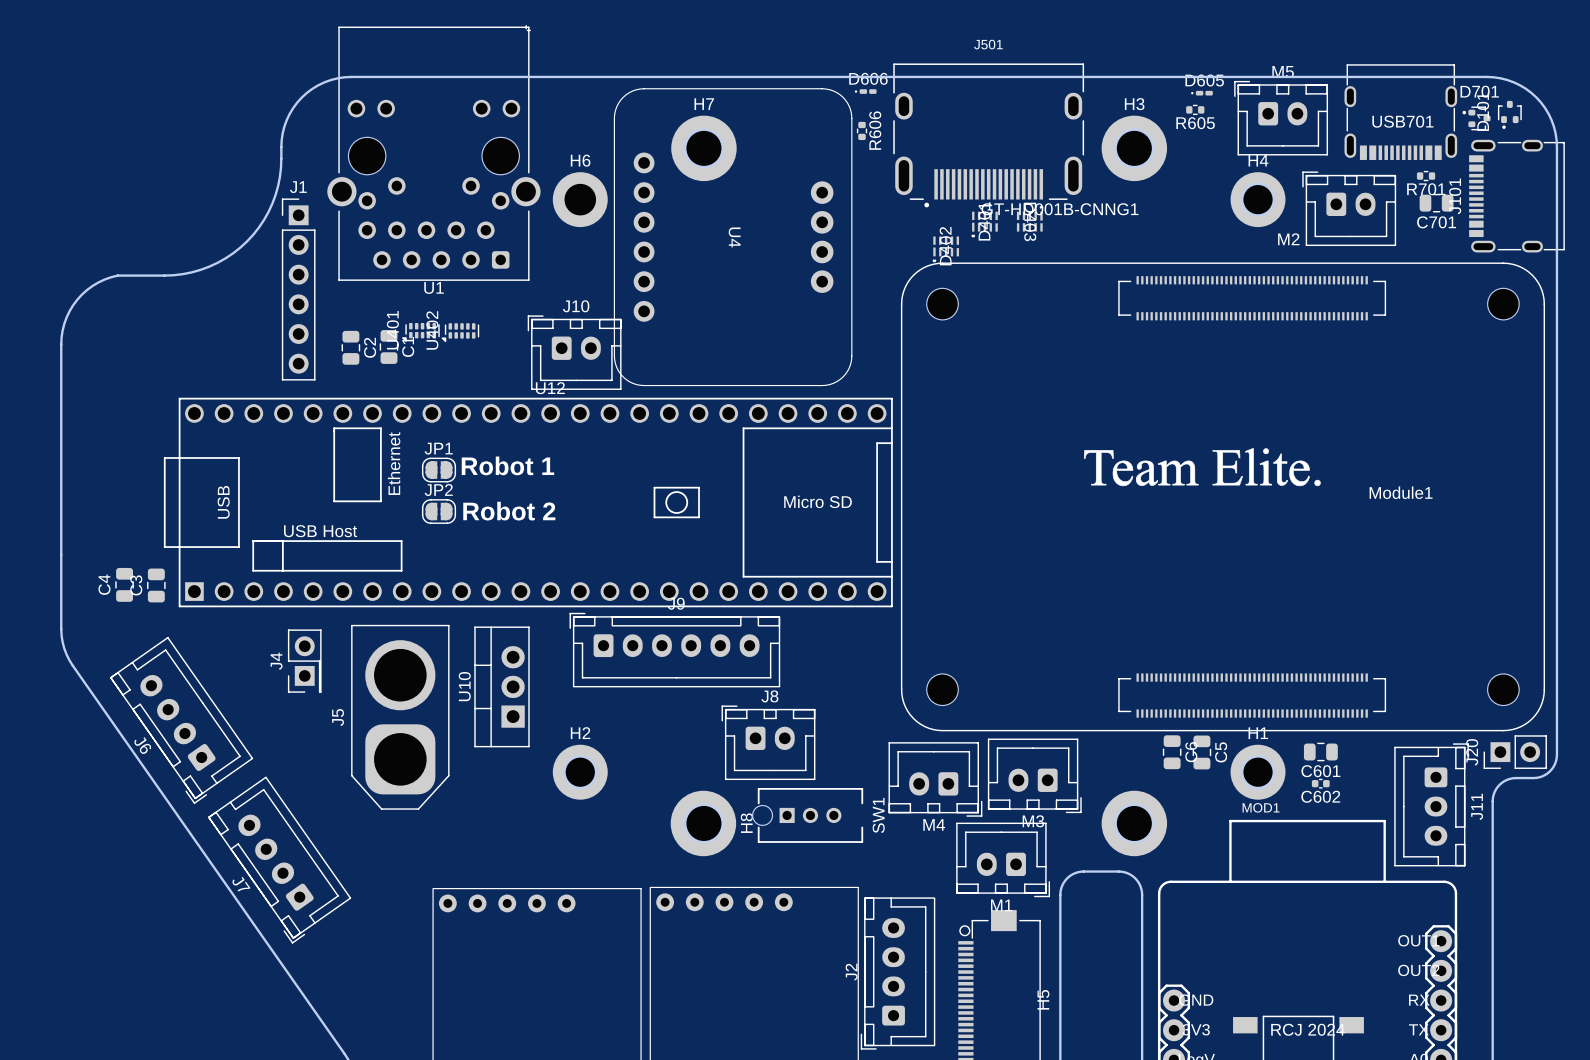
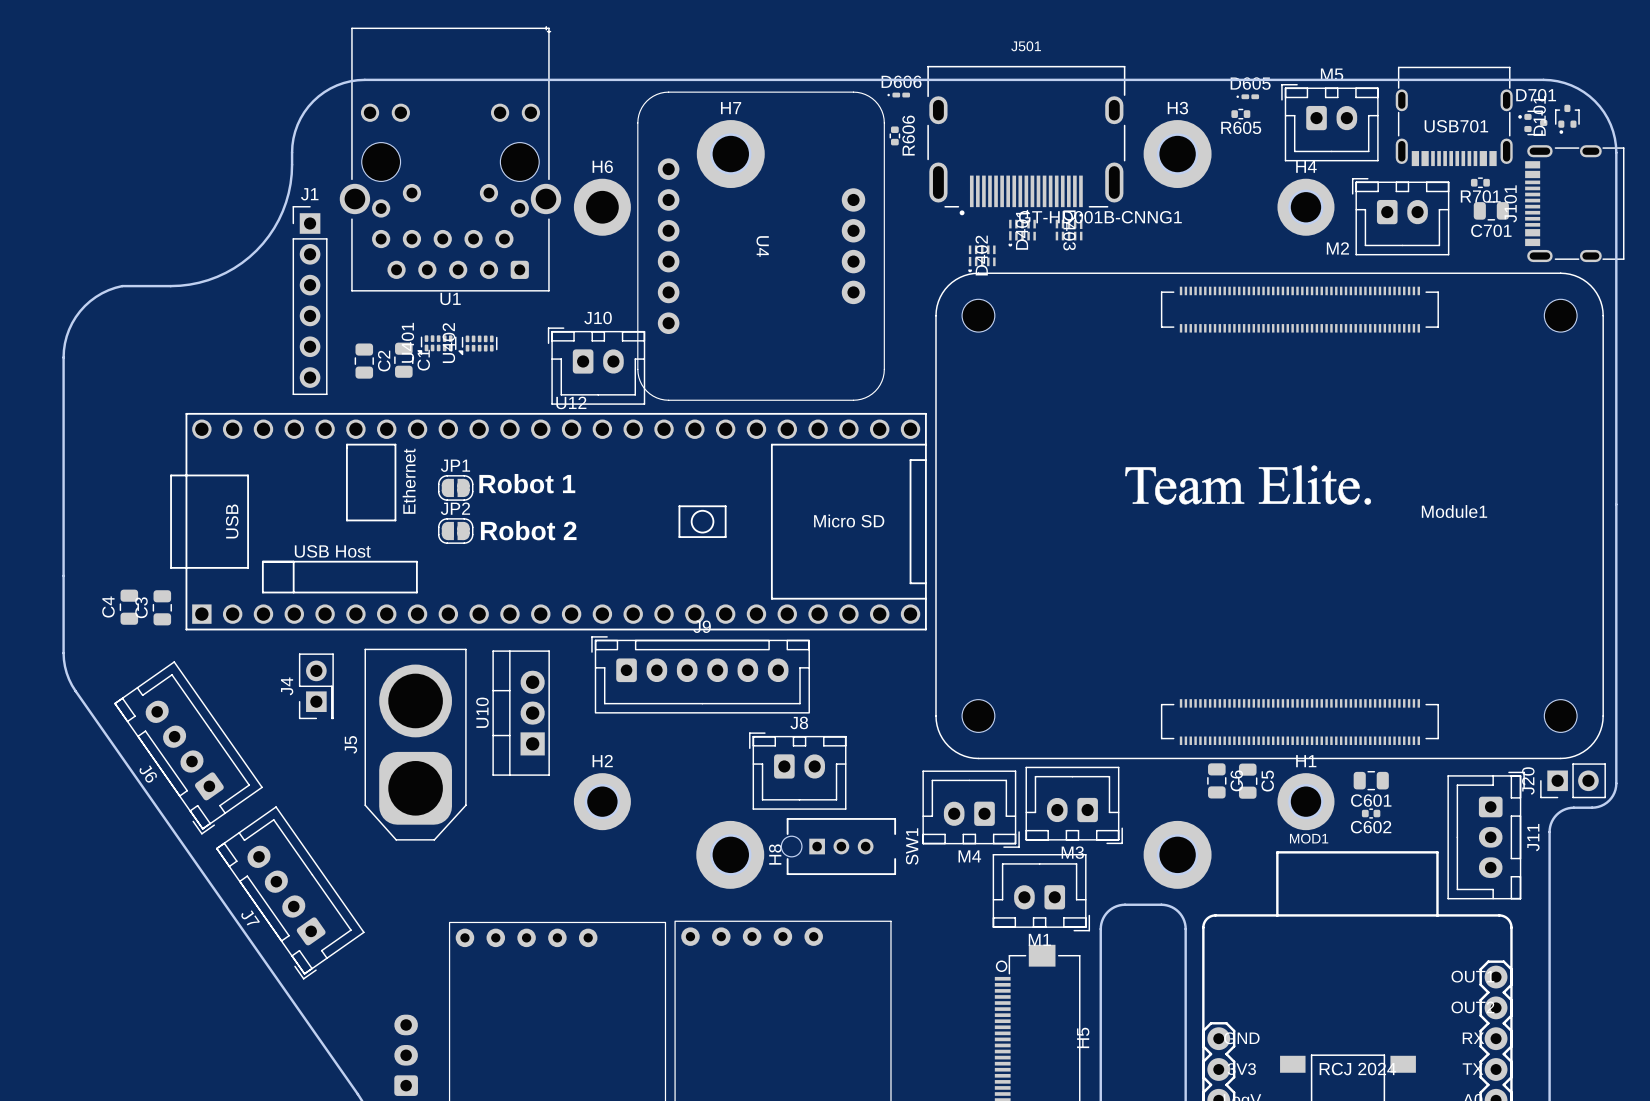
J2: (898, 973) -> none
part: none -> (406, 1055)

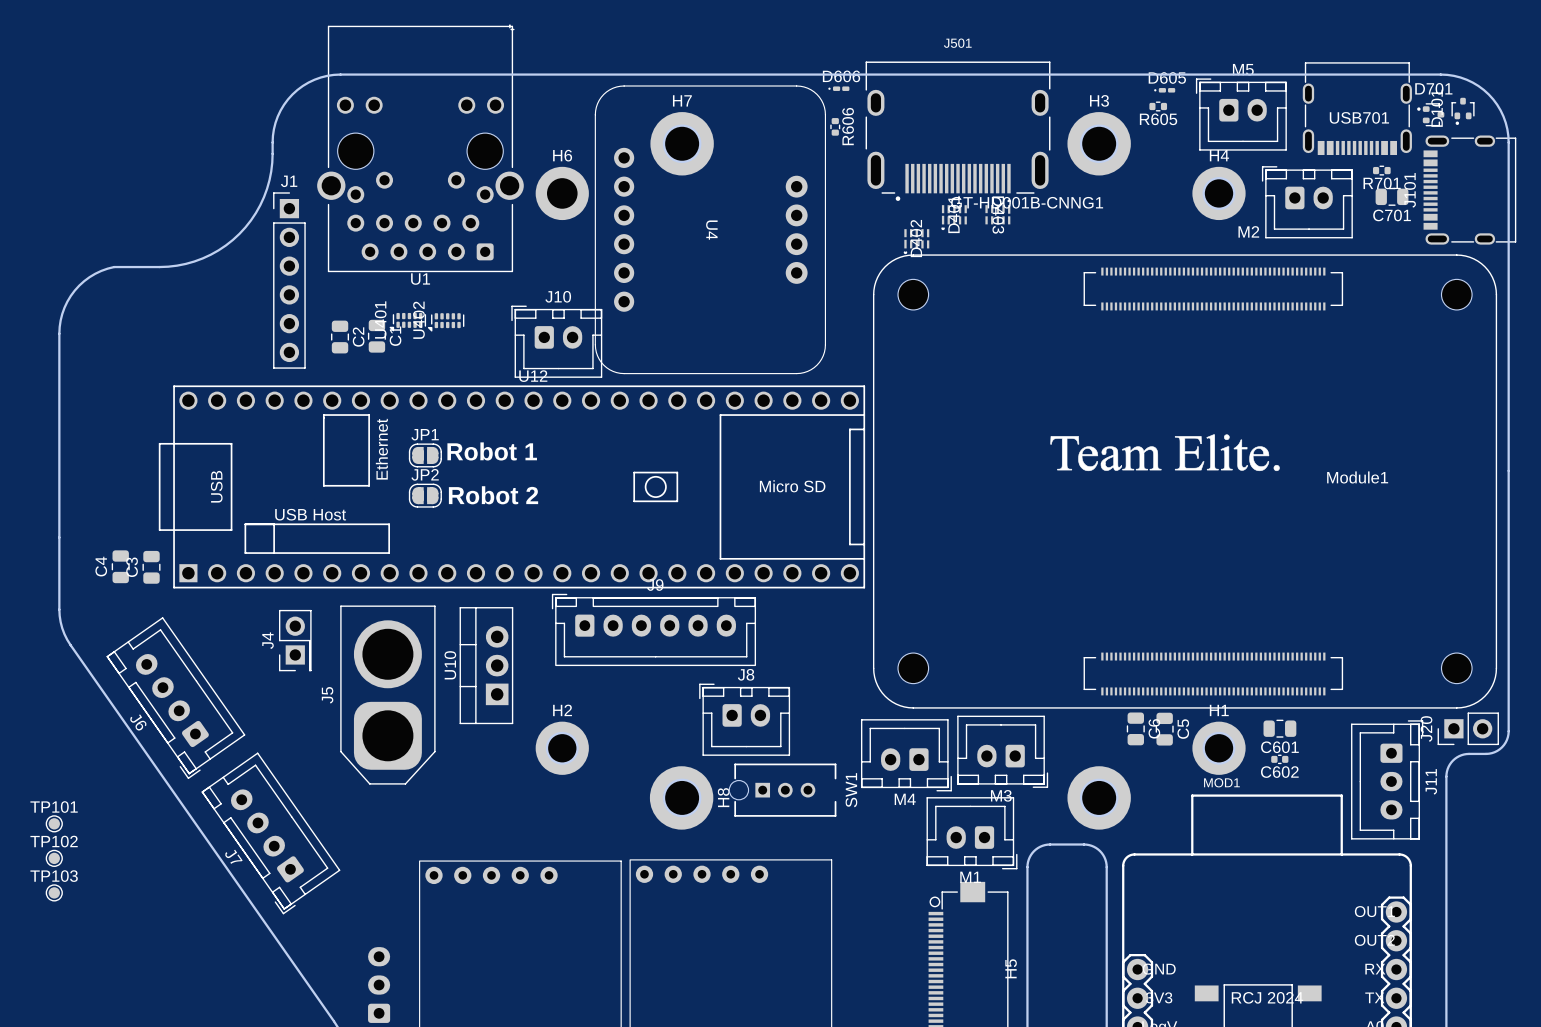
TP101: none -> (54, 823)
TP102: none -> (54, 858)
TP103: none -> (54, 892)

